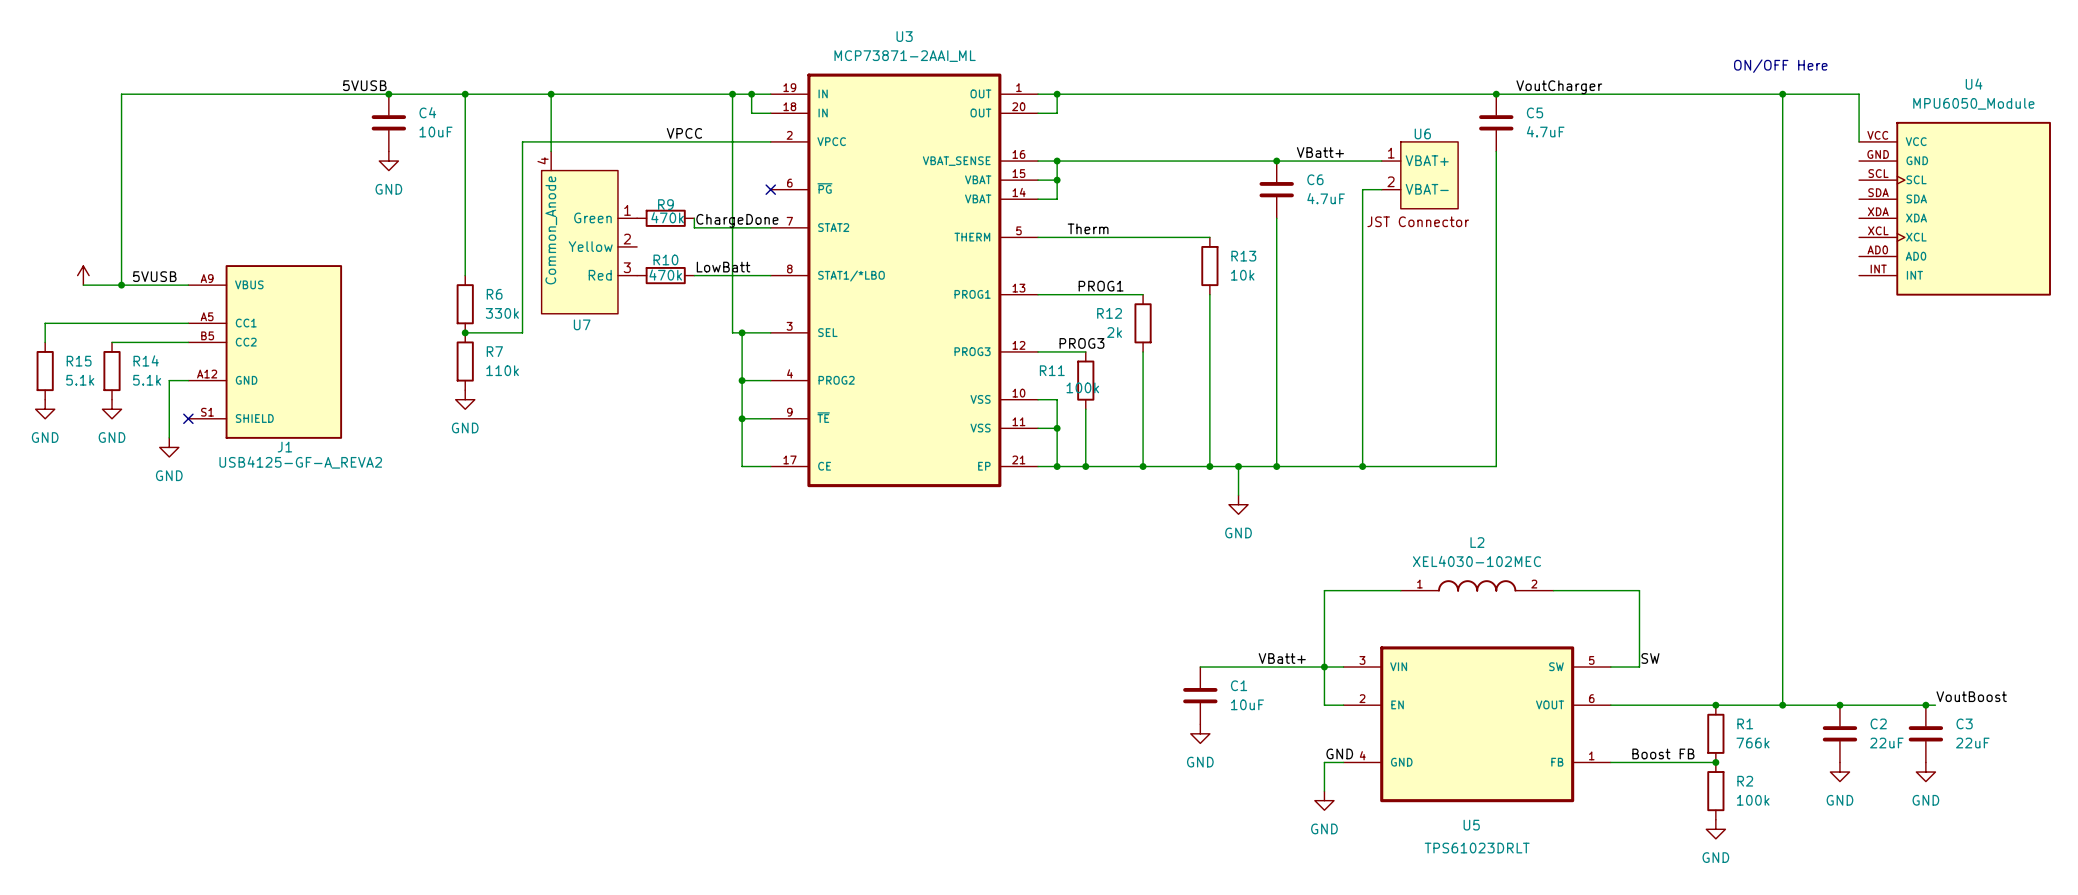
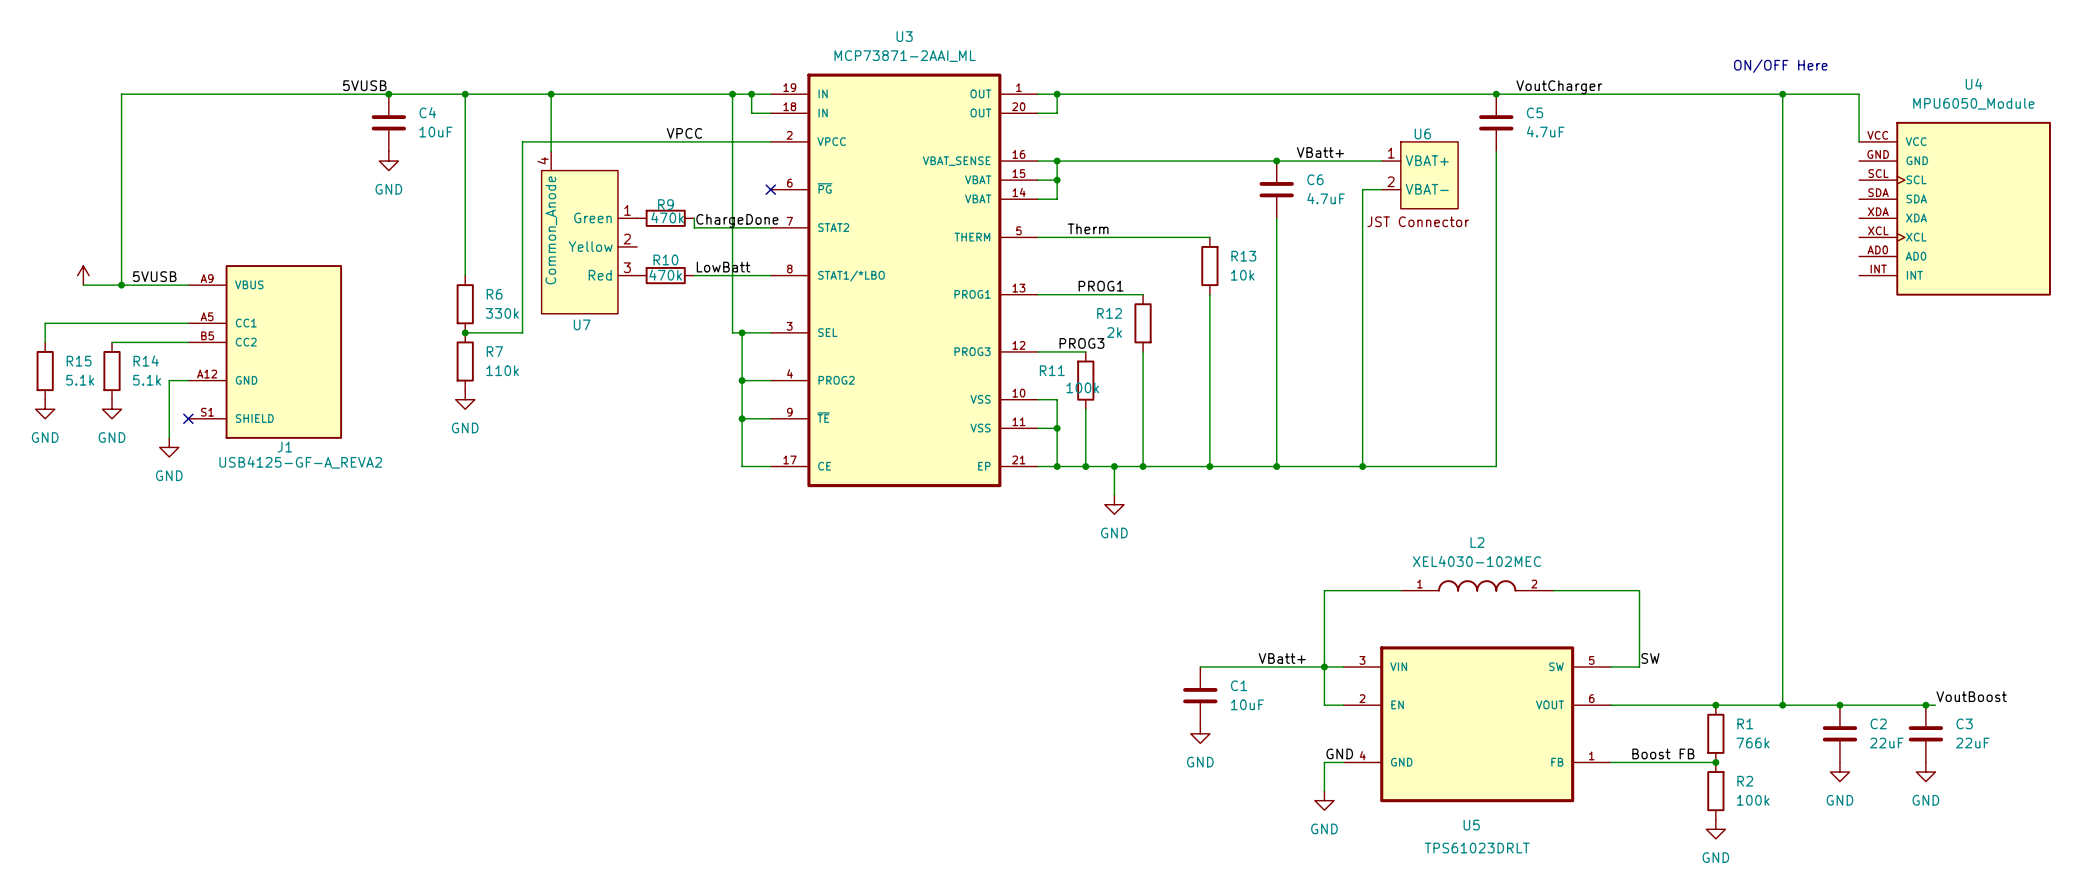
junction: none -> (1114, 466)
wire: (1238, 466) (1238, 495) -> (1114, 466) (1114, 495)
junction: (1238, 466) -> none
power symbol position: GND (1238, 504) -> GND (1114, 504)

